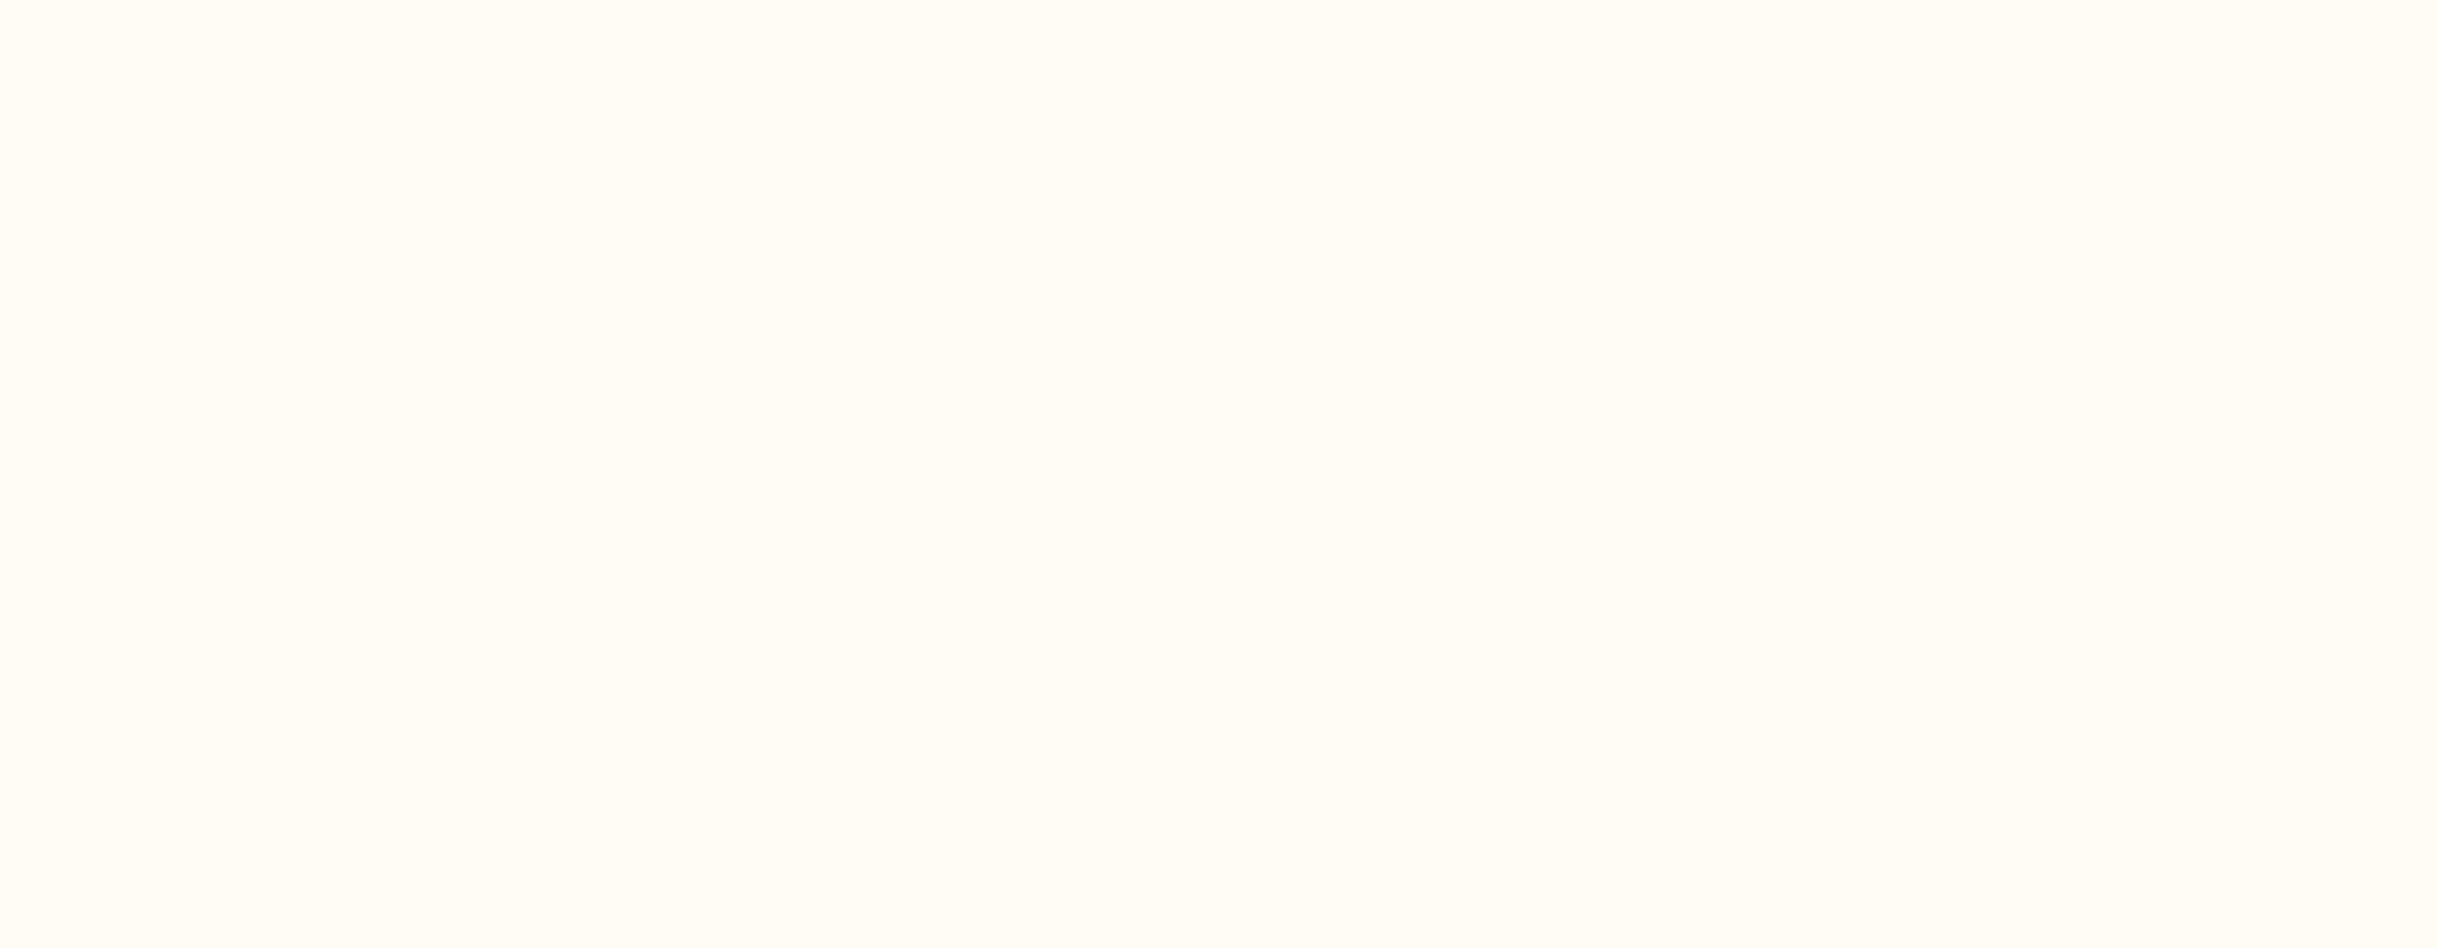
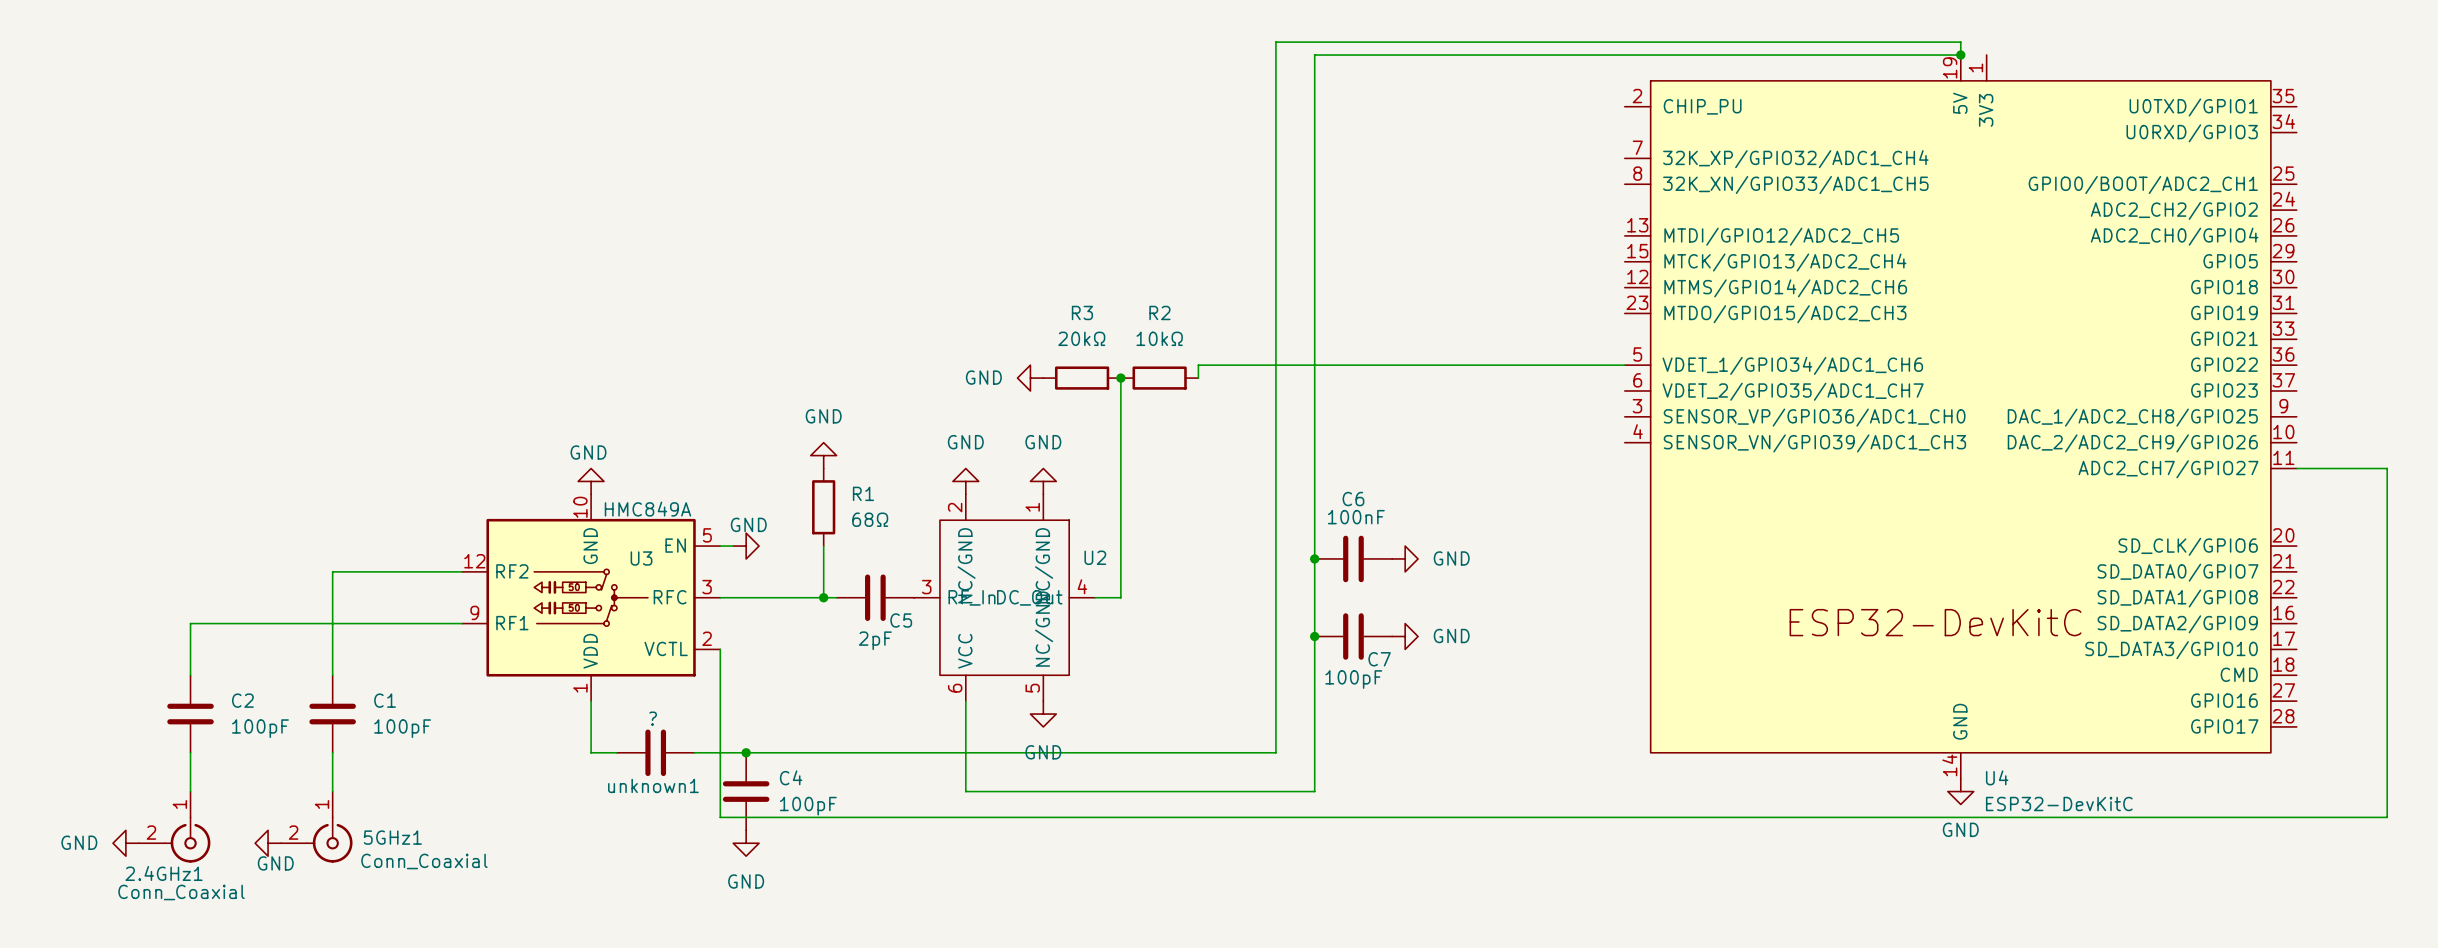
junction: none -> (1960, 55)
wire: none -> (1624, 365) (1198, 365) (1198, 378)
power symbol: none -> GND (1030, 378)
R3: none -> 20kΩ (1082, 378)
wire: none -> (1120, 378) (1120, 597) (1095, 597)
junction: none -> (1120, 378)
R2: none -> 10kΩ (1159, 378)
U4: none -> ESP32-DevKitC (1960, 416)
power symbol: none -> GND (823, 455)
wire: none -> (2296, 468) (2387, 468) (2387, 817) (720, 817) (720, 649)
power symbol: none -> GND (591, 481)
power symbol: none -> GND (965, 481)
power symbol: none -> GND (1043, 481)
R1: none -> 68Ω (823, 507)
wire: none -> (720, 546) (733, 546)
power symbol: none -> GND (746, 546)
wire: none -> (823, 546) (823, 597)
junction: none -> (1314, 558)
C6: none -> 100nF (1353, 558)
power symbol: none -> GND (1405, 558)
wire: none -> (461, 571) (332, 571) (332, 675)
U3: none -> HMC849A (591, 597)
wire: none -> (720, 597) (836, 597)
junction: none -> (823, 597)
C5: none -> 2pF (875, 597)
U2: none -> (1004, 597)
wire: none -> (461, 623) (190, 623) (190, 675)
junction: none -> (1314, 636)
C7: none -> 100pF (1353, 636)
power symbol: none -> GND (1405, 636)
wire: none -> (591, 701) (591, 752) (616, 752)
wire: none -> (965, 701) (965, 791) (1314, 791) (1314, 55) (1960, 55) (1960, 42) (1275, 42) (1275, 752) (694, 752)
C2: none -> 100pF (190, 714)
C1: none -> 100pF (332, 714)
power symbol: none -> GND (1043, 714)
wire: none -> (190, 752) (190, 791)
wire: none -> (332, 752) (332, 791)
unknown1: none -> ? (655, 752)
junction: none -> (746, 752)
C4: none -> 100pF (746, 791)
power symbol: none -> GND (1960, 791)
2.4GHz1: none -> Conn_Coaxial (174, 827)
5GHz1: none -> Conn_Coaxial (316, 827)
power symbol: none -> GND (125, 843)
power symbol: none -> GND (268, 843)
power symbol: none -> GND (746, 843)

